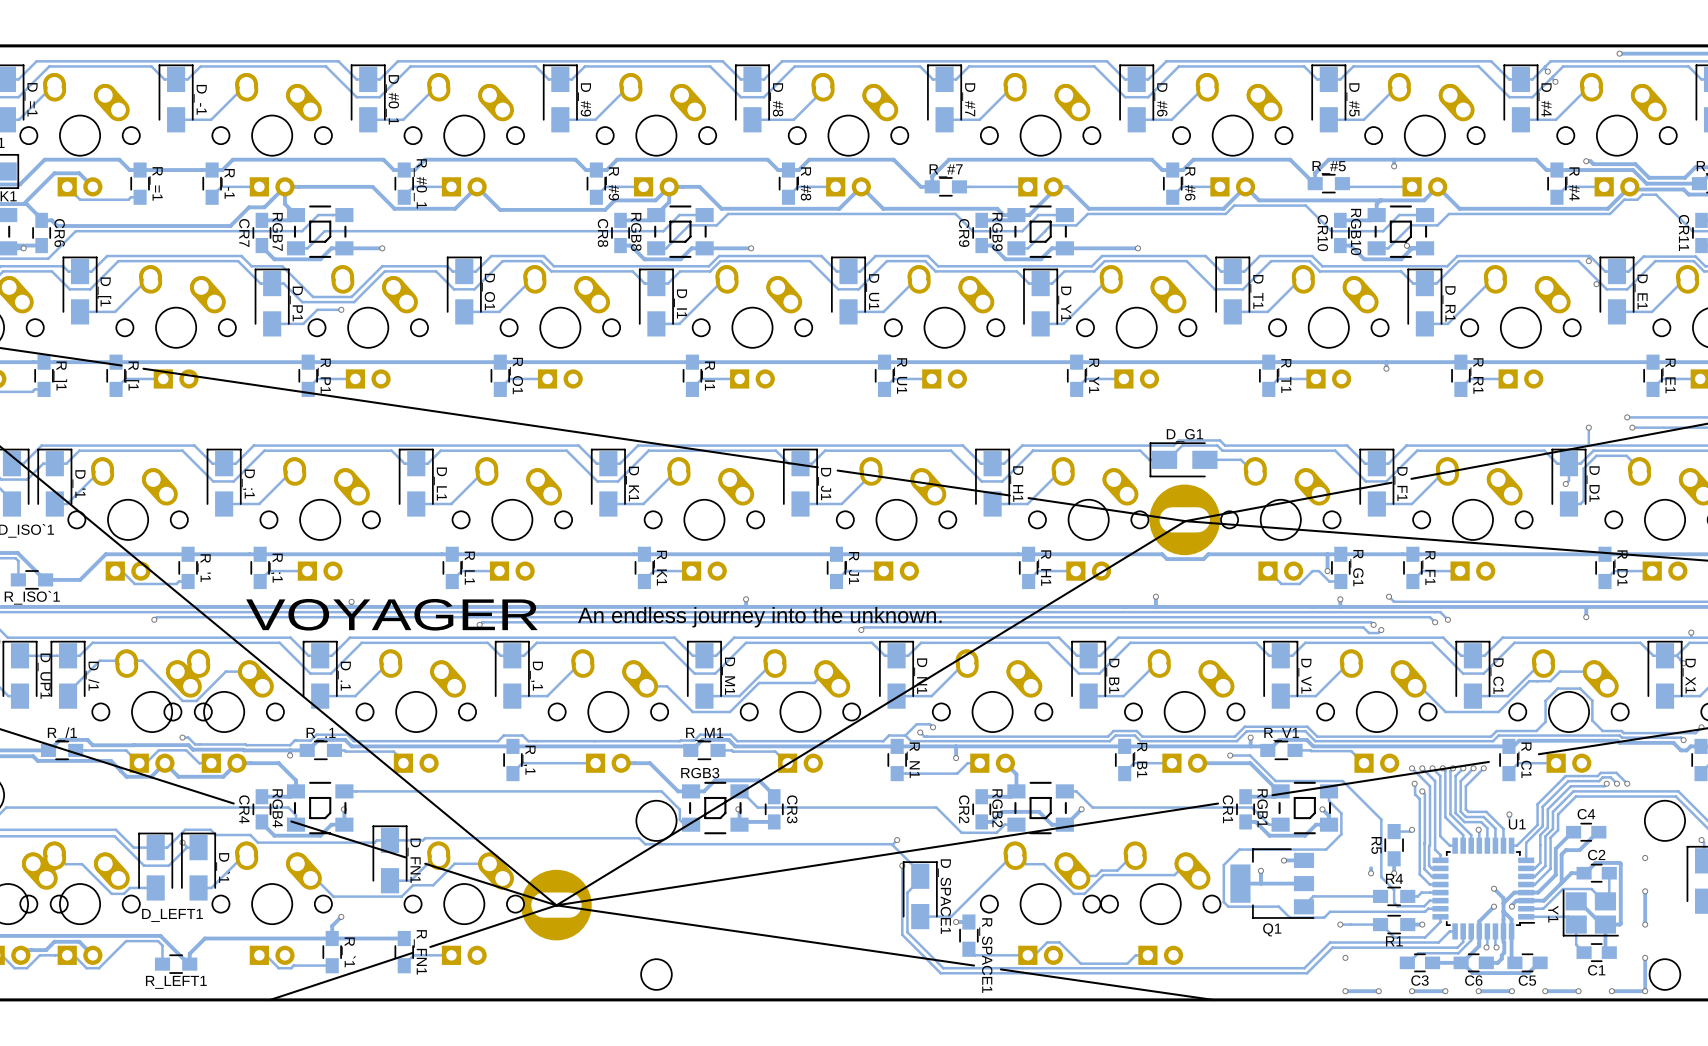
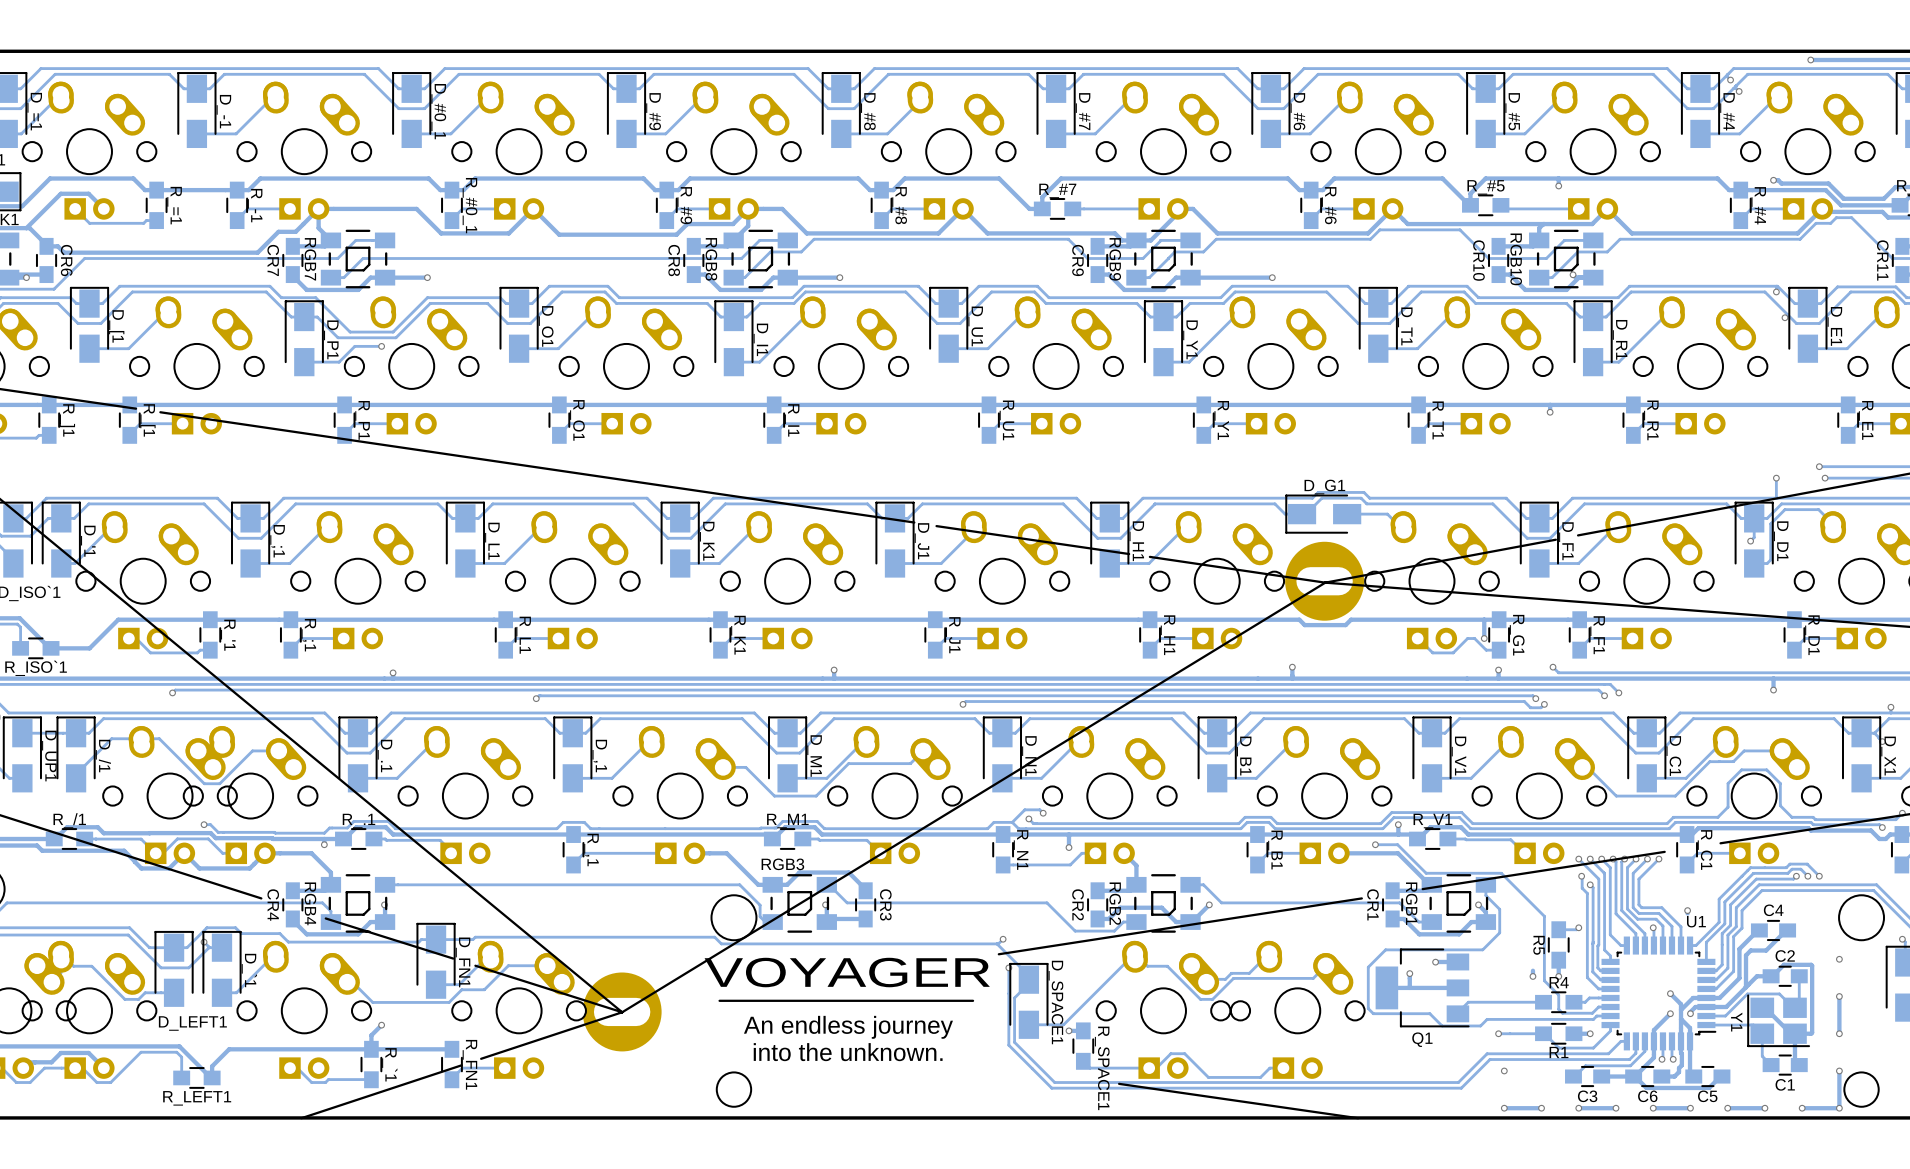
text: VOYAGER (391, 614) -> none
text: An endless journey into the unknown. (759, 617) -> none
line: (1218, 803) (556, 905) (974, 965) -> (1361, 898) (998, 954)
text: none -> VOYAGER (847, 972)
line: none -> (973, 1000) (719, 1000)
text: none -> An endless journey (848, 1027)
text: none -> into the unknown. (848, 1052)

